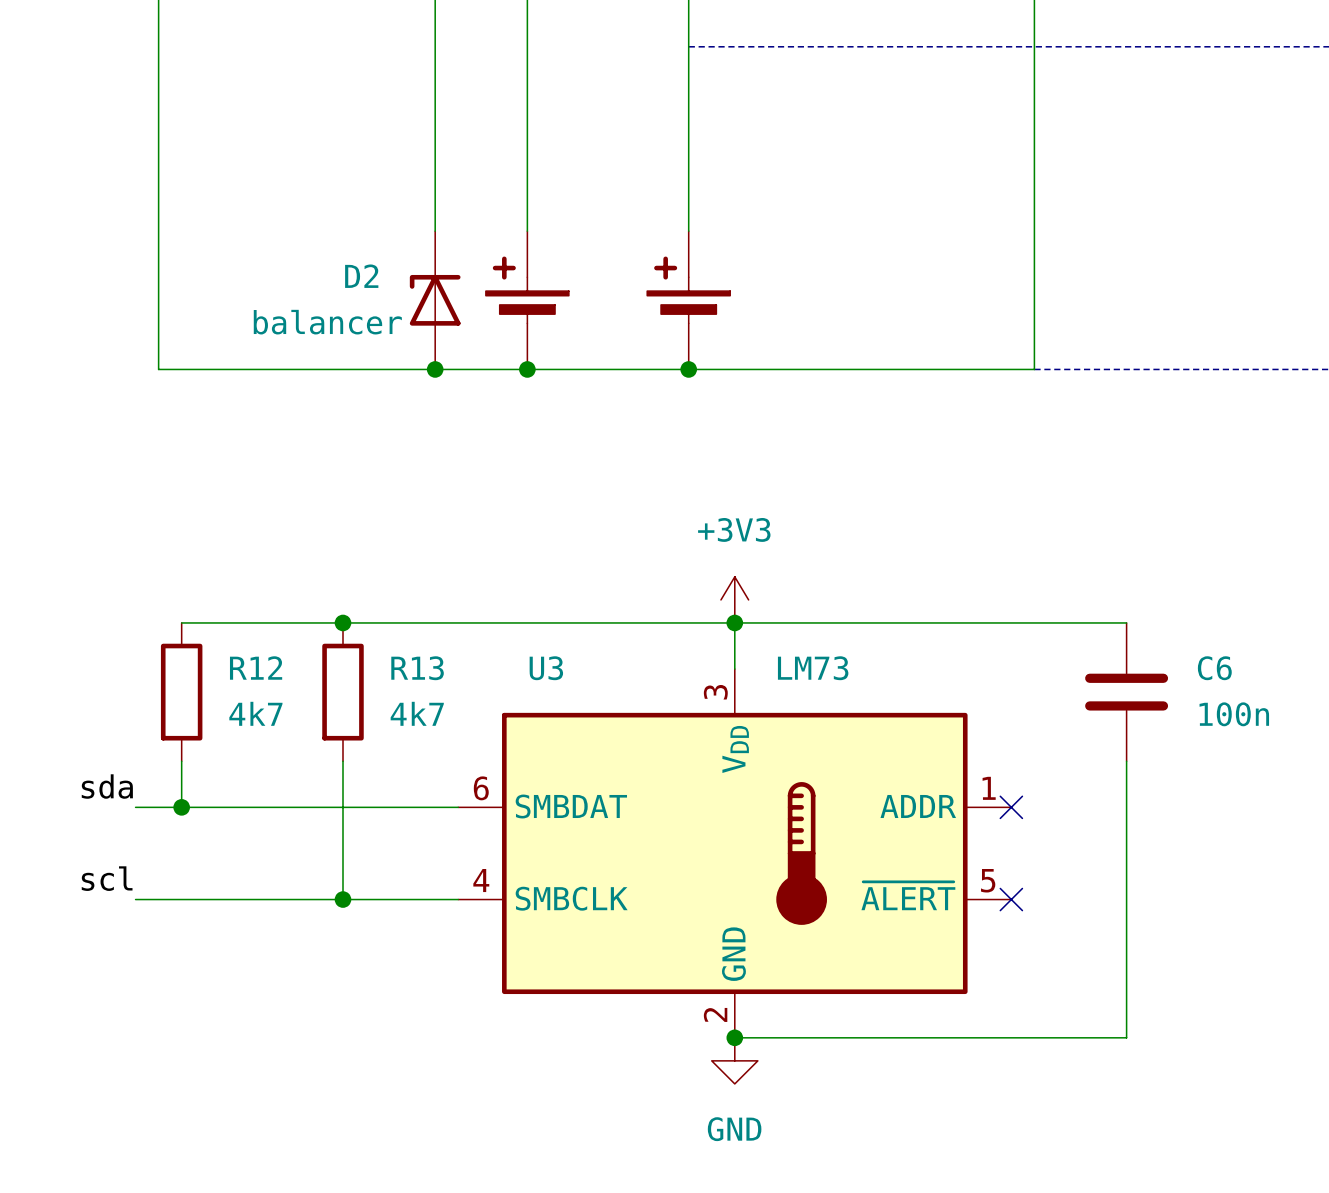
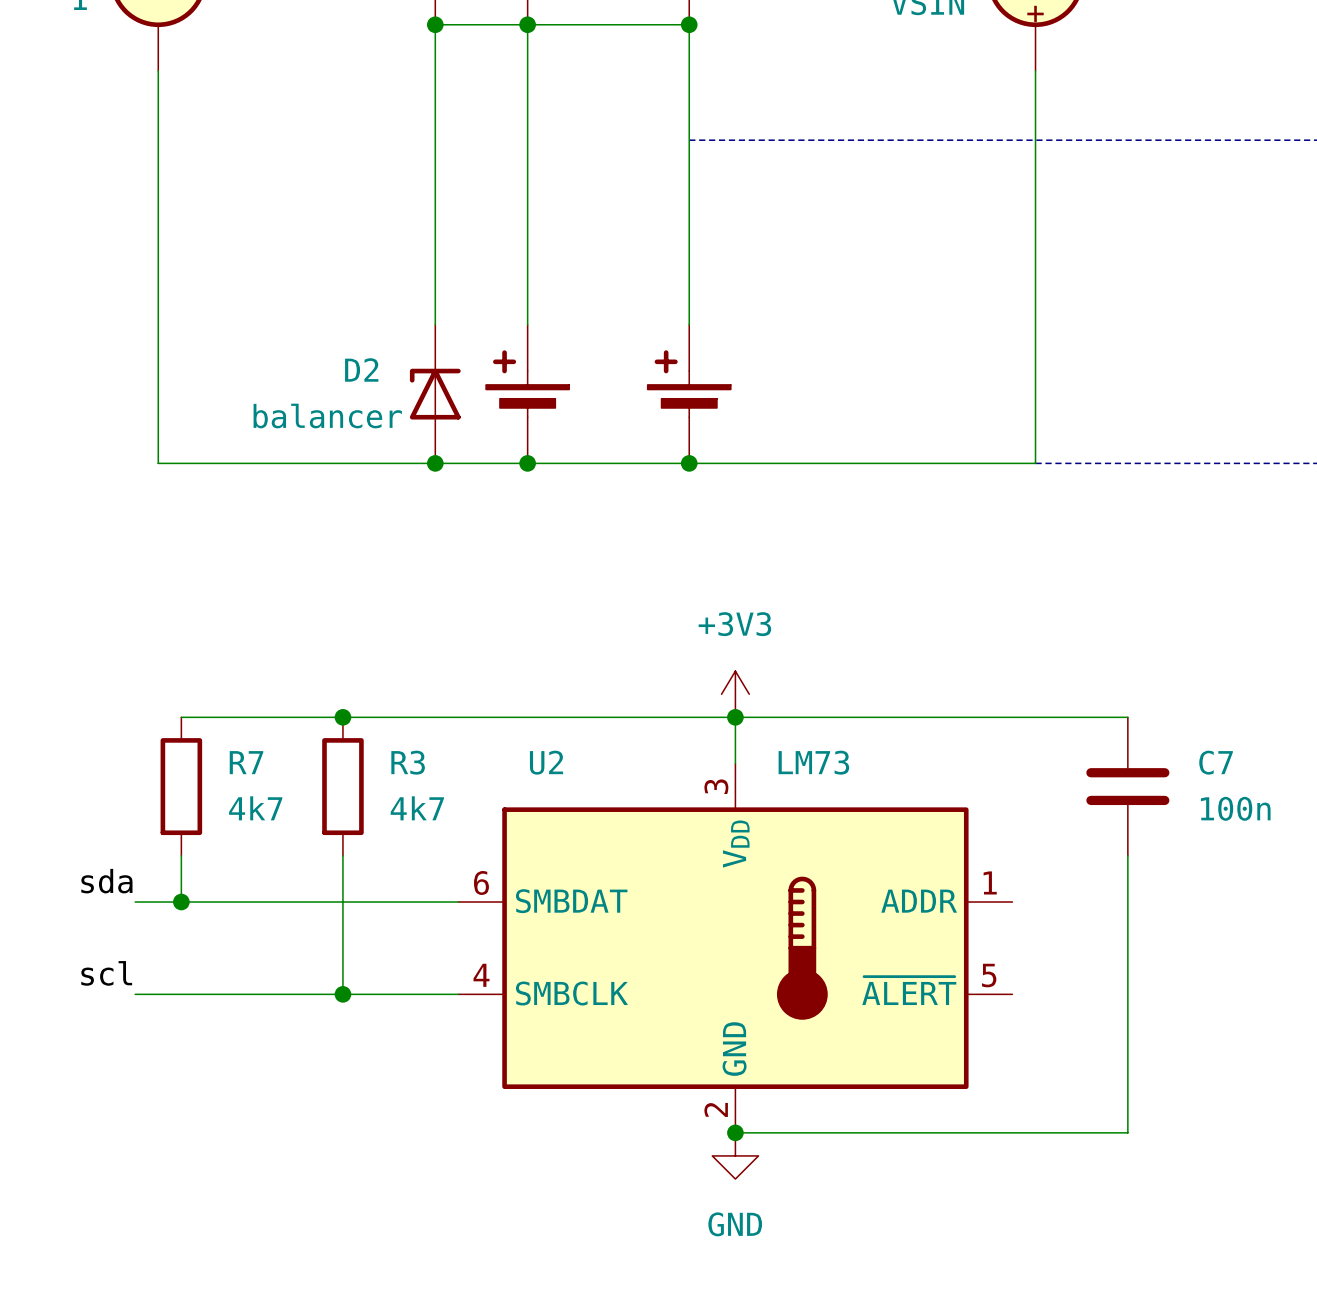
R12 name: R12 (256, 668) -> R7 (246, 762)
R13 name: R13 (417, 668) -> R3 (408, 762)
U3 name: U3 (546, 668) -> U2 (546, 762)
C6 name: C6 (1214, 668) -> C7 (1216, 762)
no-connect mark: (1011, 807) -> none
no-connect mark: (1011, 899) -> none

